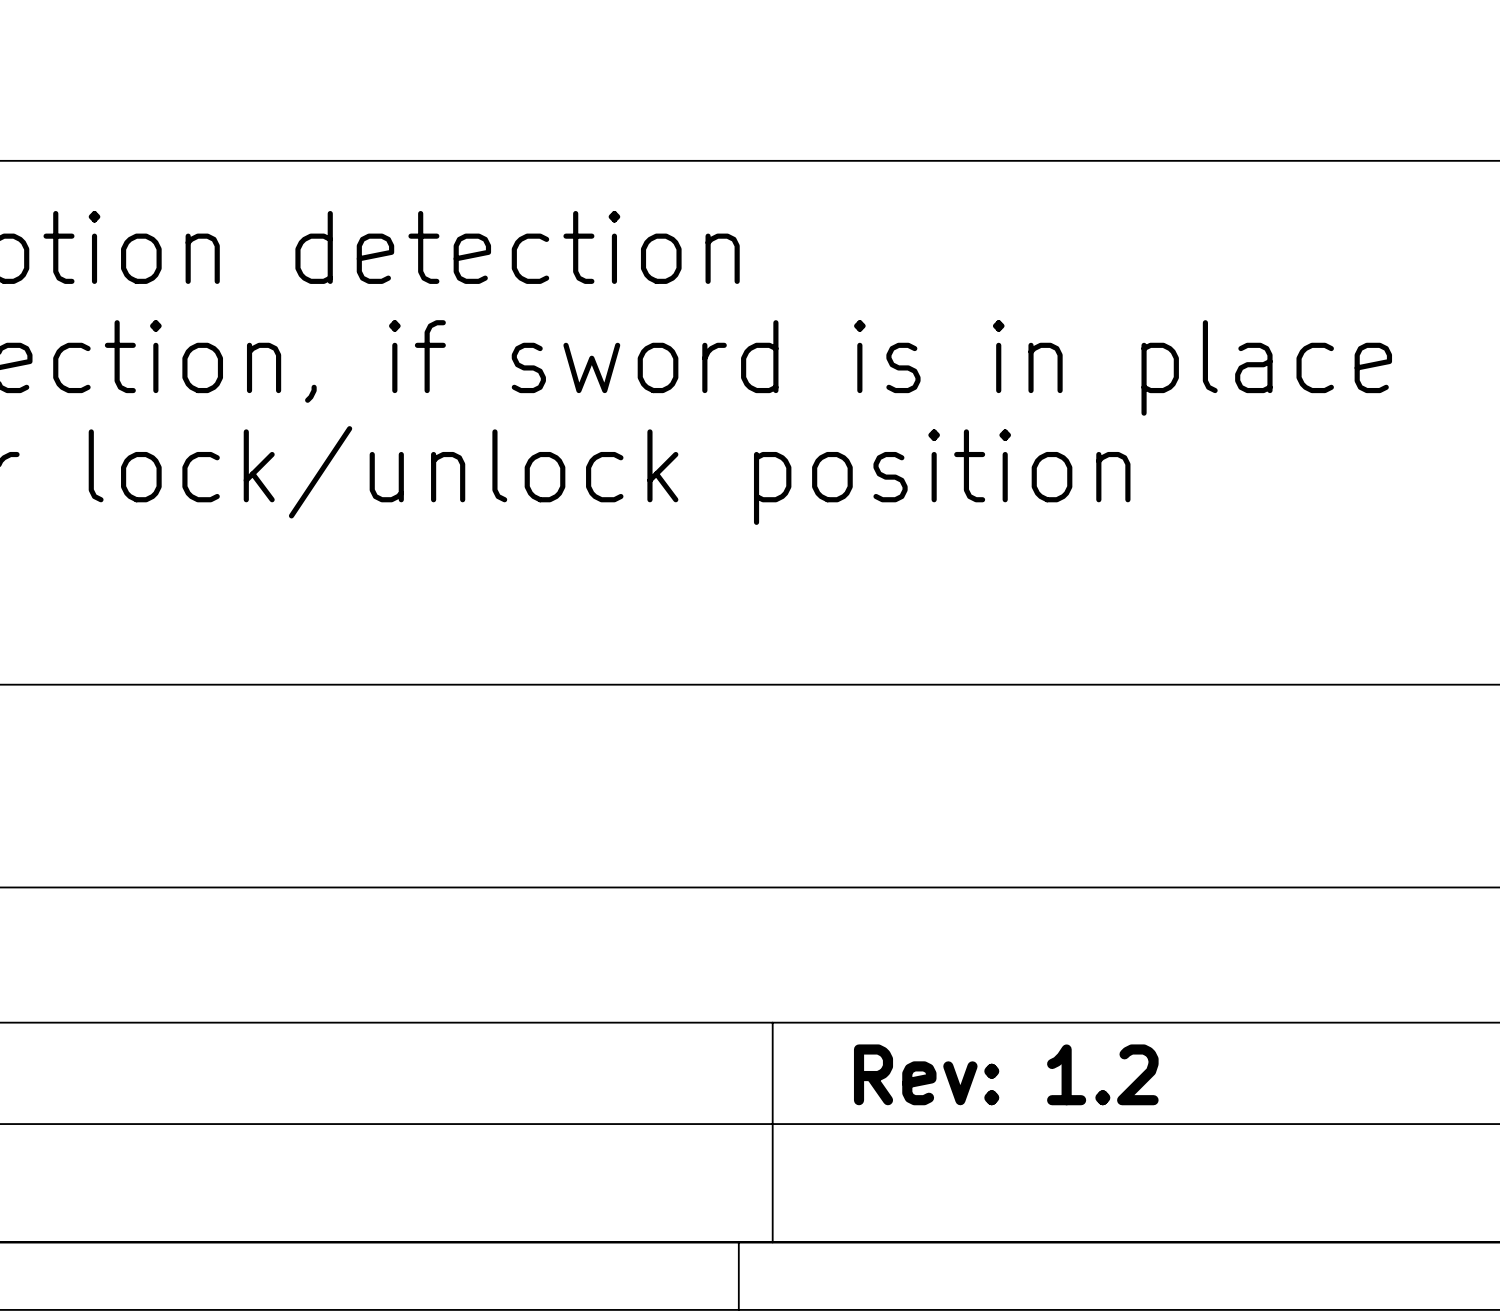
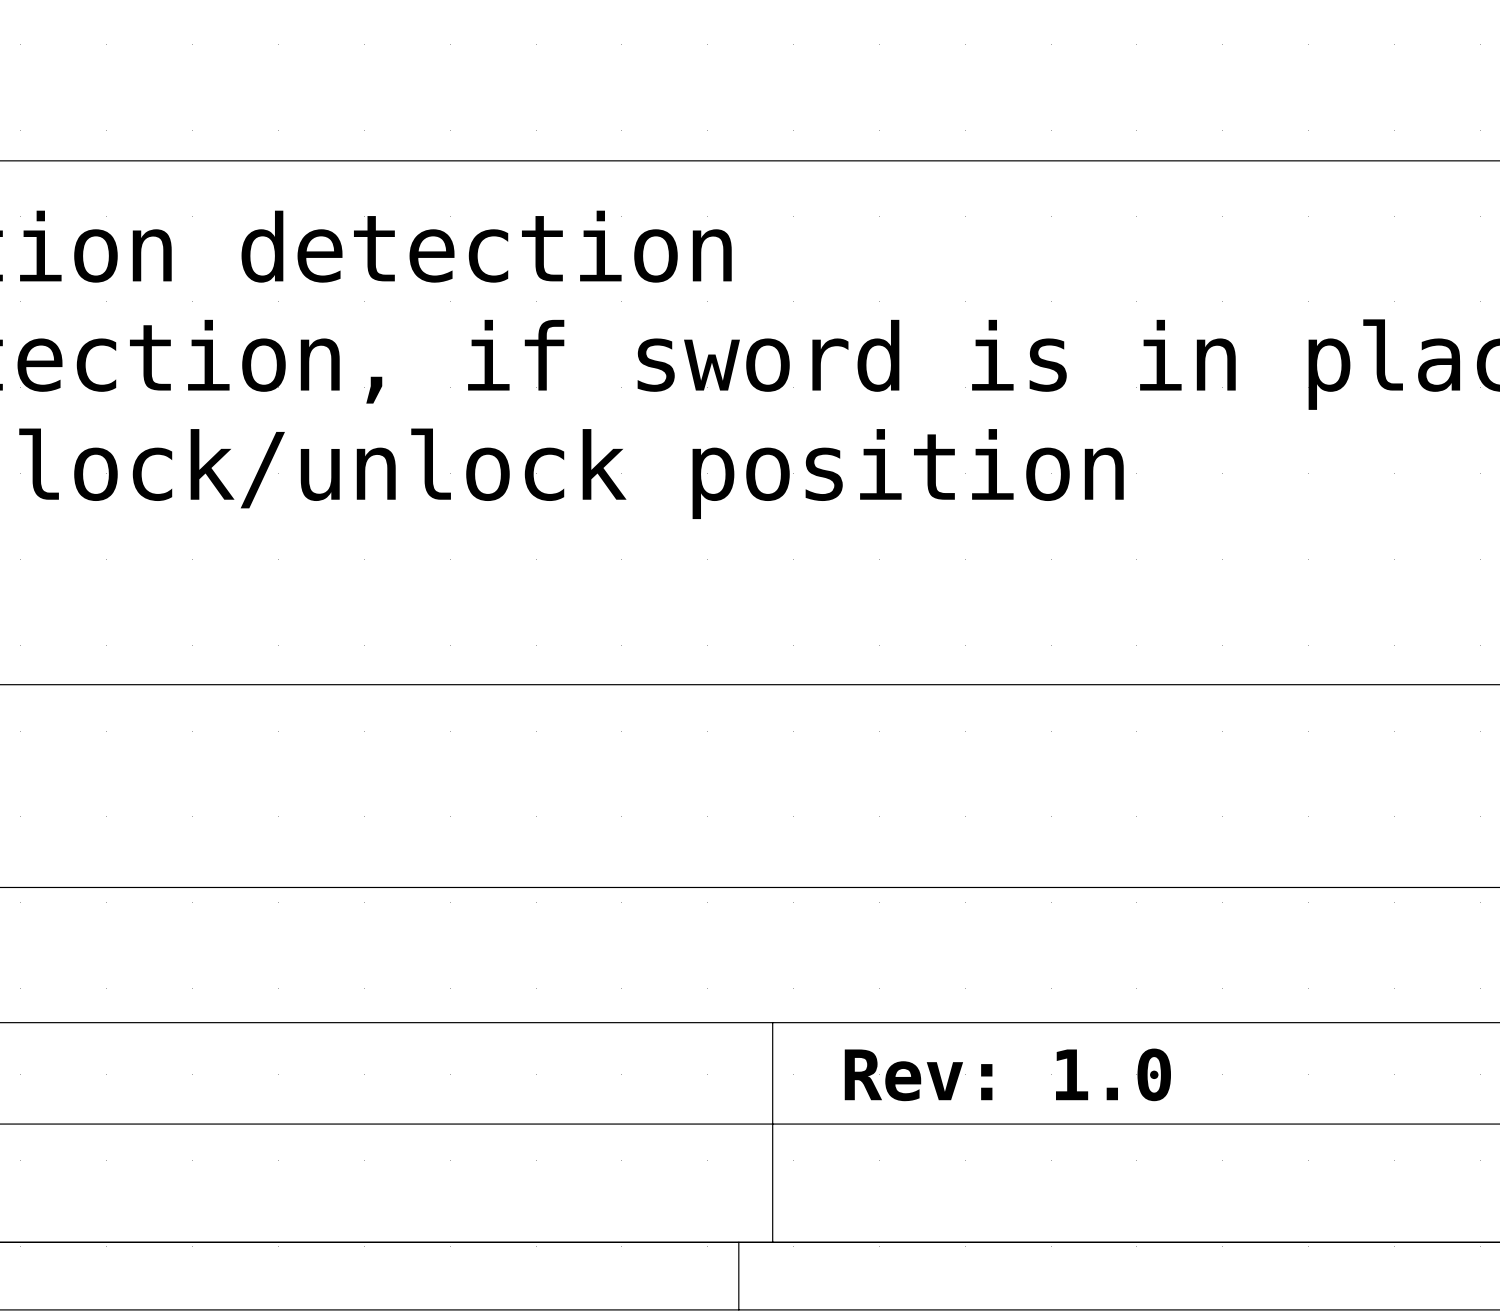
title block: Rev: 1.2 (1006, 1074) -> Rev: 1.0 (1007, 1074)

